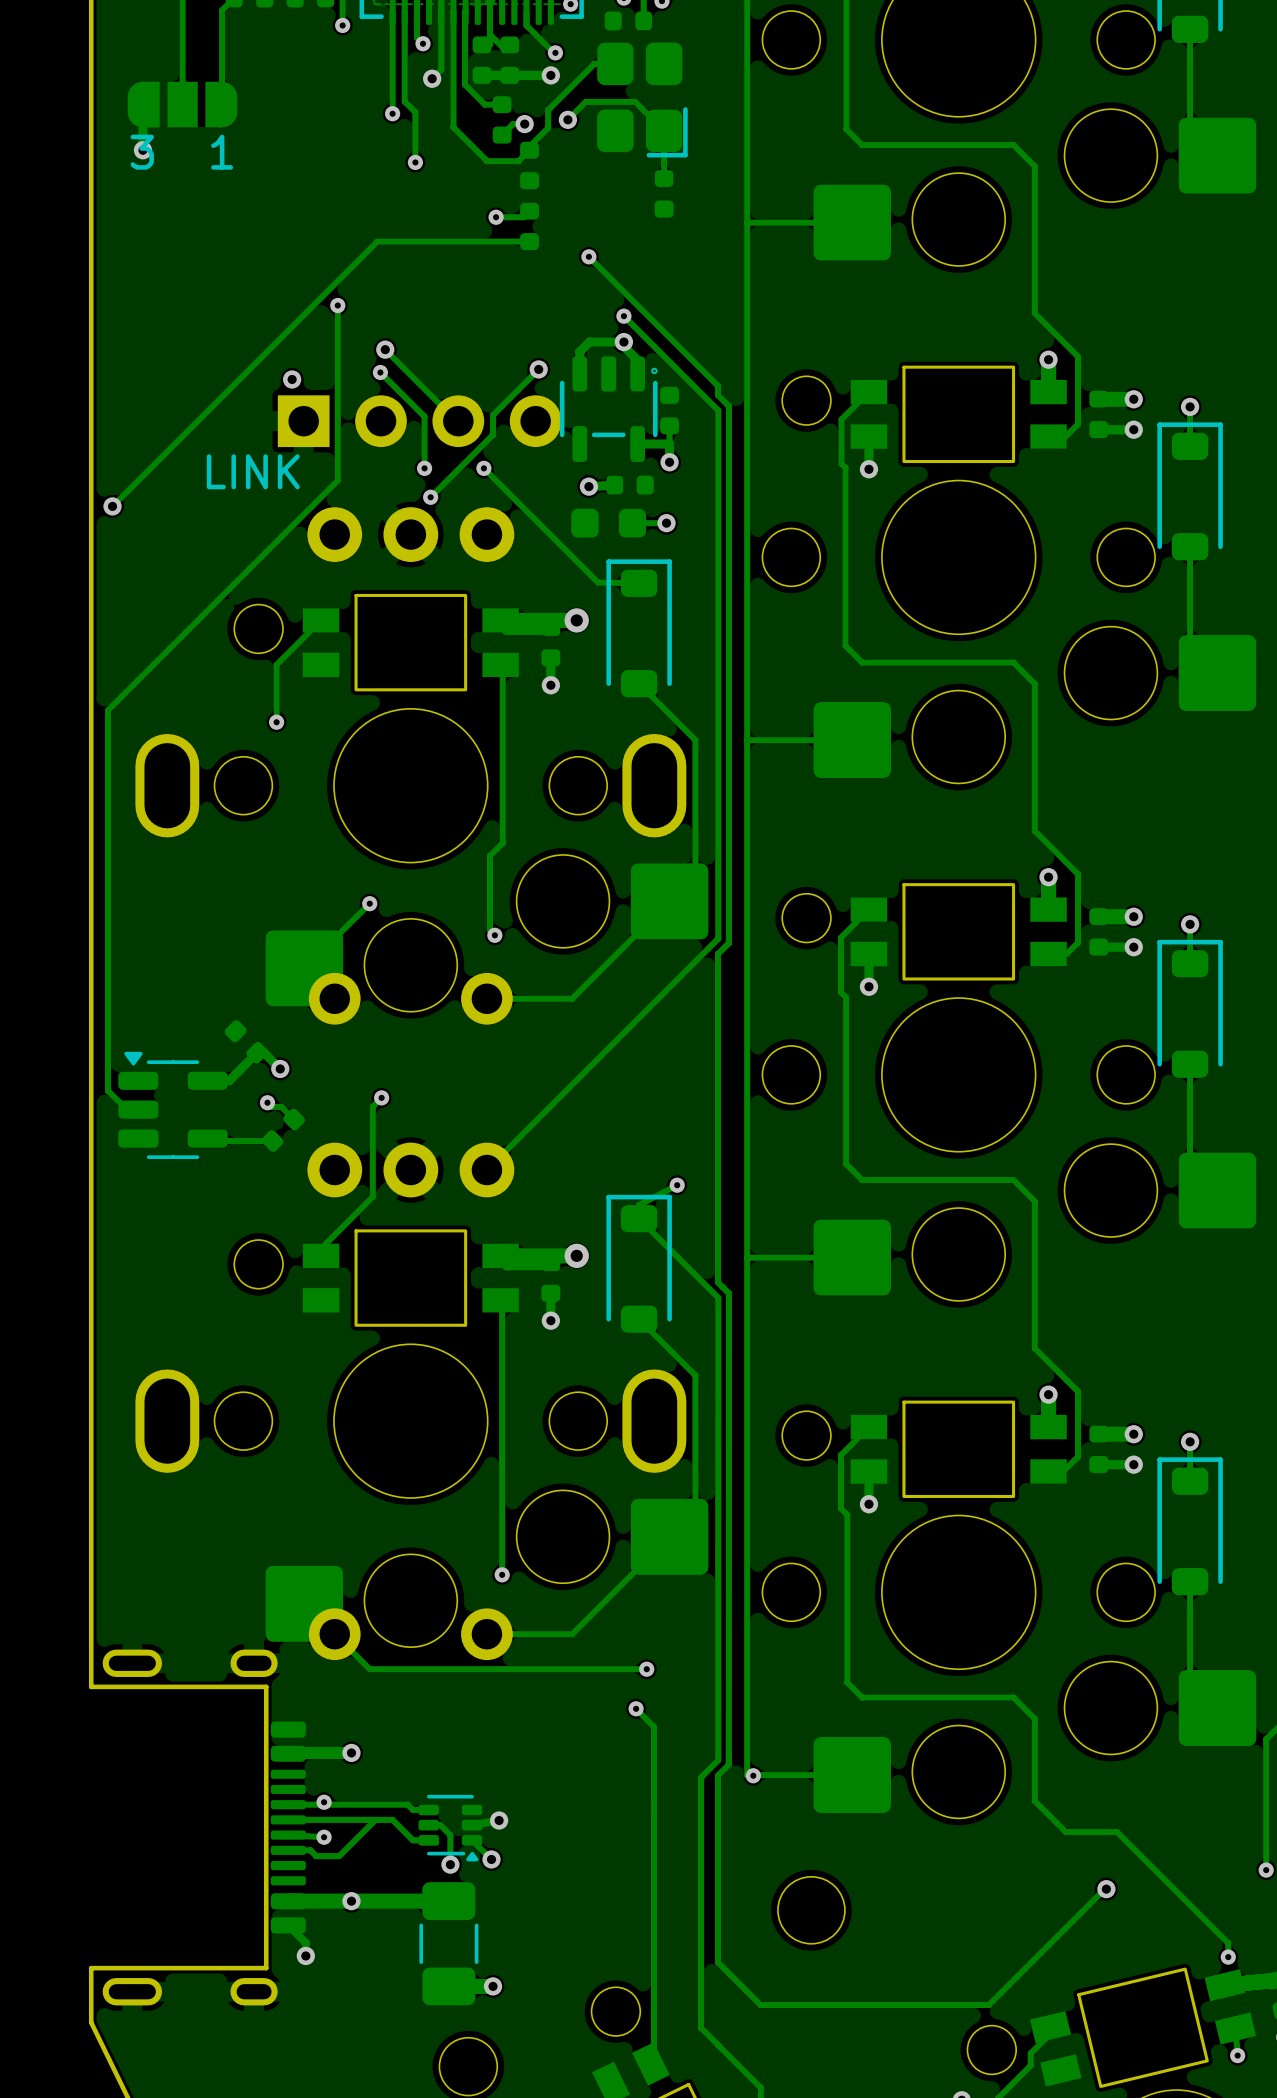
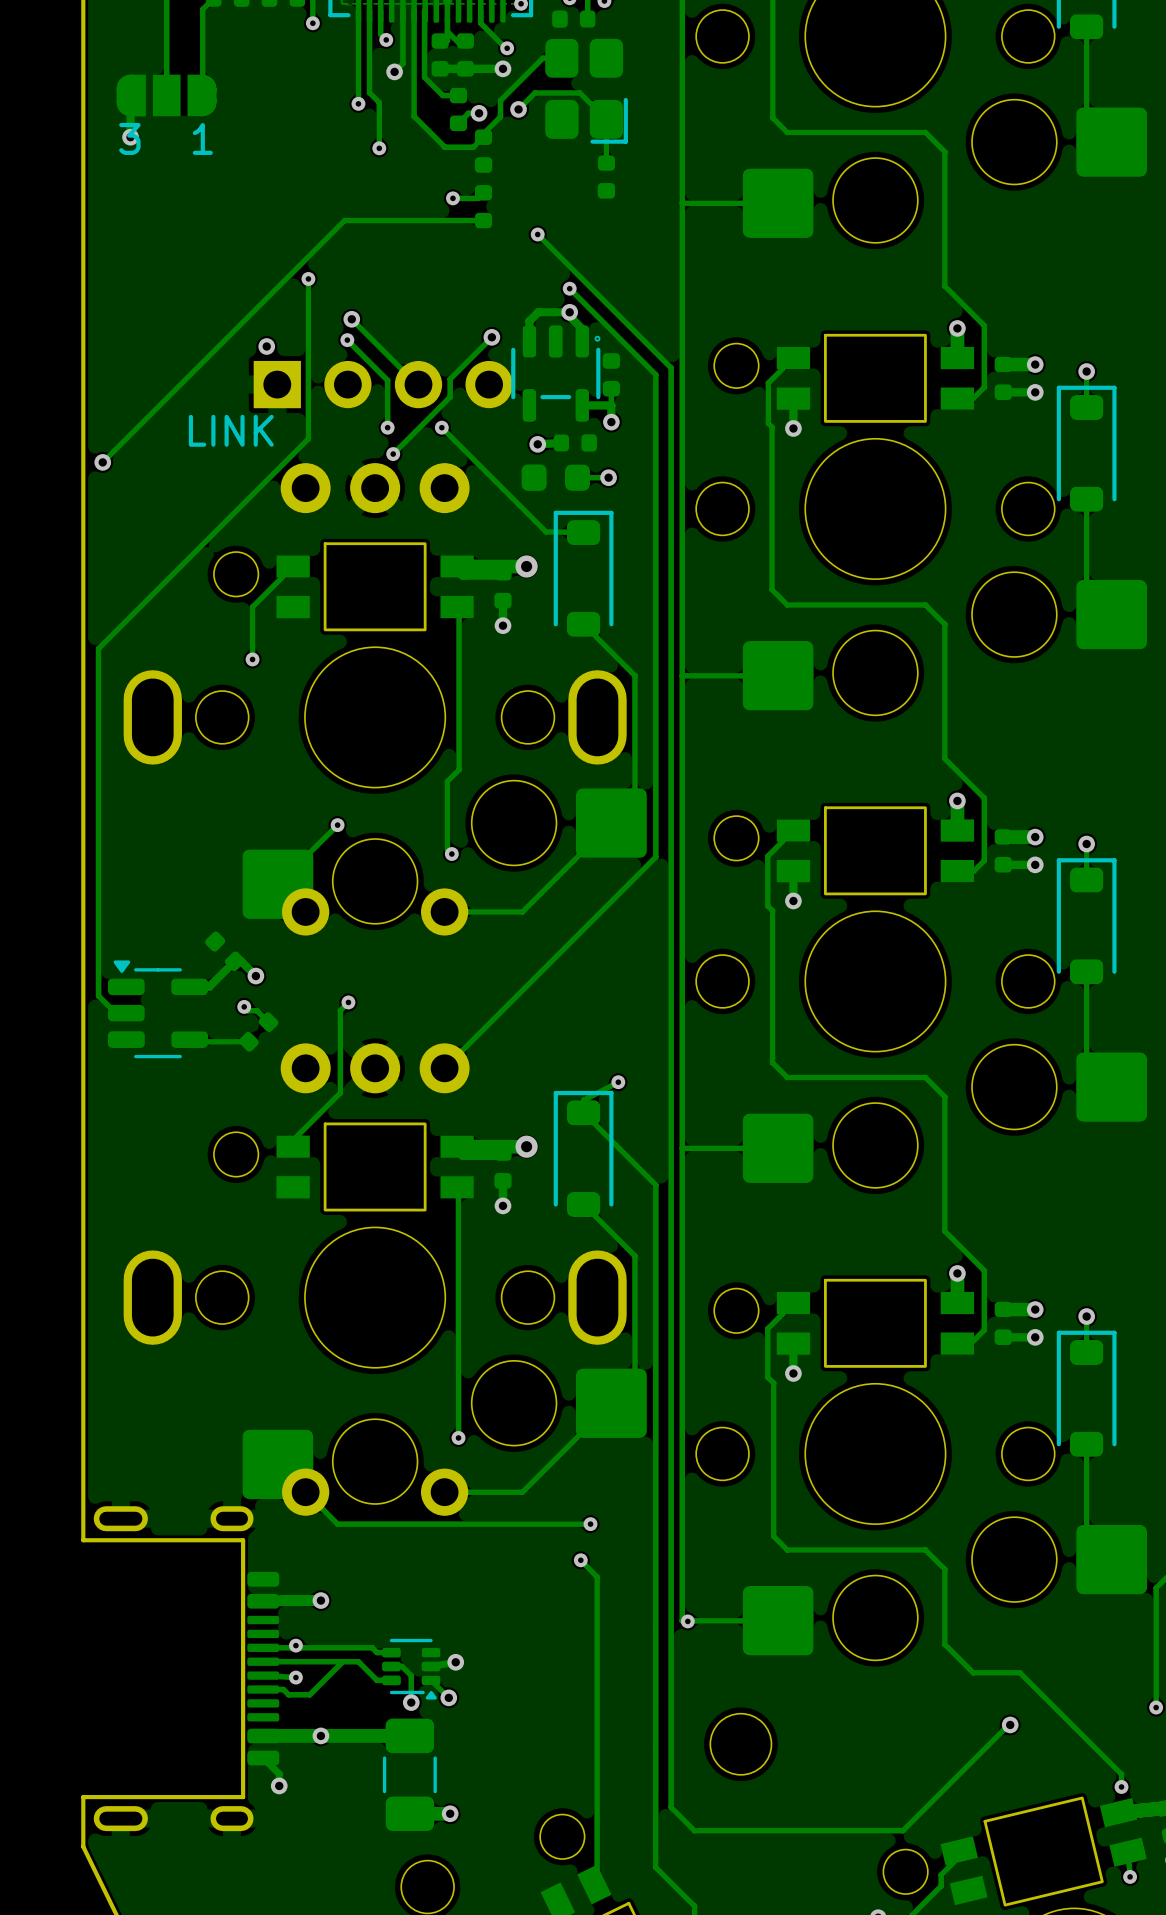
track: (717, 385) (717, 395) (728, 406) (728, 943) (717, 954) (717, 1282) (722, 1287) -> (655, 352) (671, 367) (671, 1807)
track: (722, 1287) (728, 1293) (728, 1764) (717, 1775) (717, 1962) (735, 1979) -> none
track: (718, 1758) (701, 1777) (701, 2027) (718, 2045) -> (655, 1605) (655, 1867)

